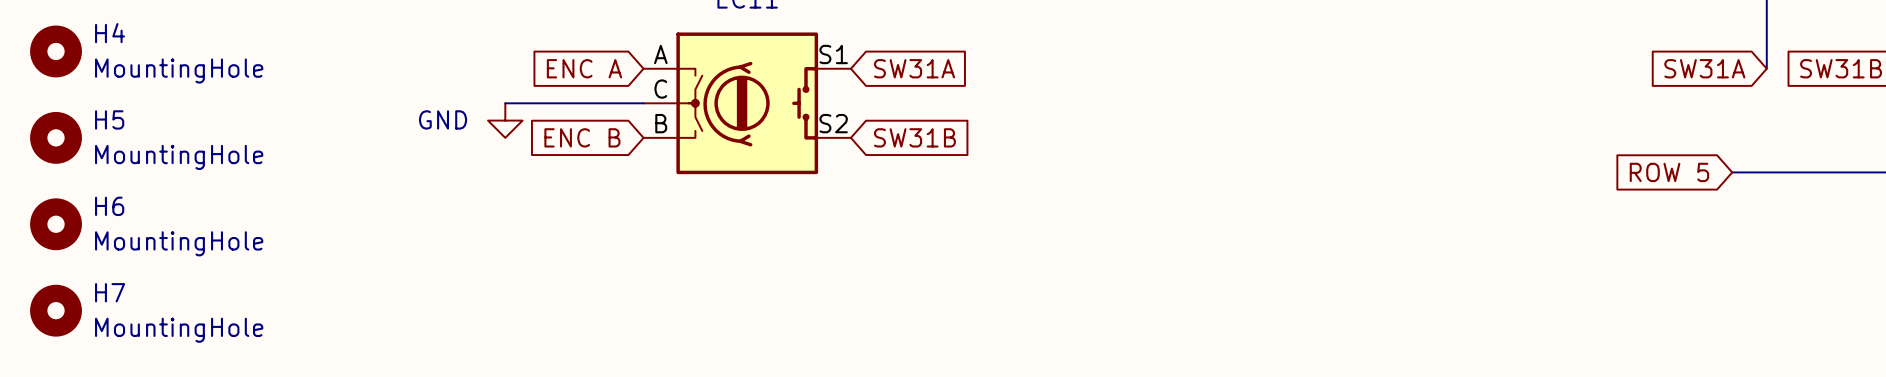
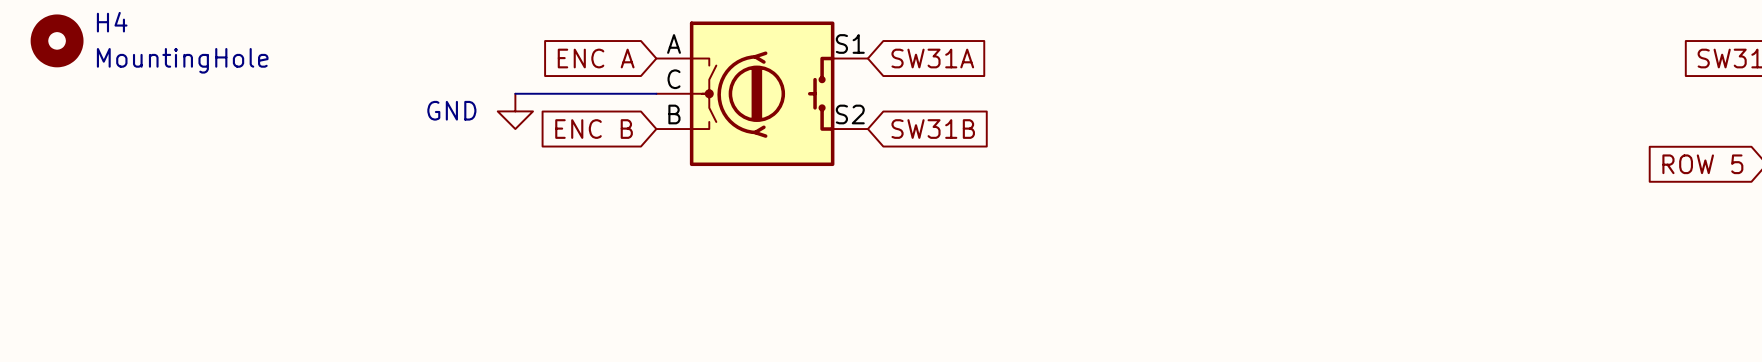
H5: MountingHole (56, 137) -> none
H6: MountingHole (56, 224) -> none
H7: MountingHole (56, 310) -> none

